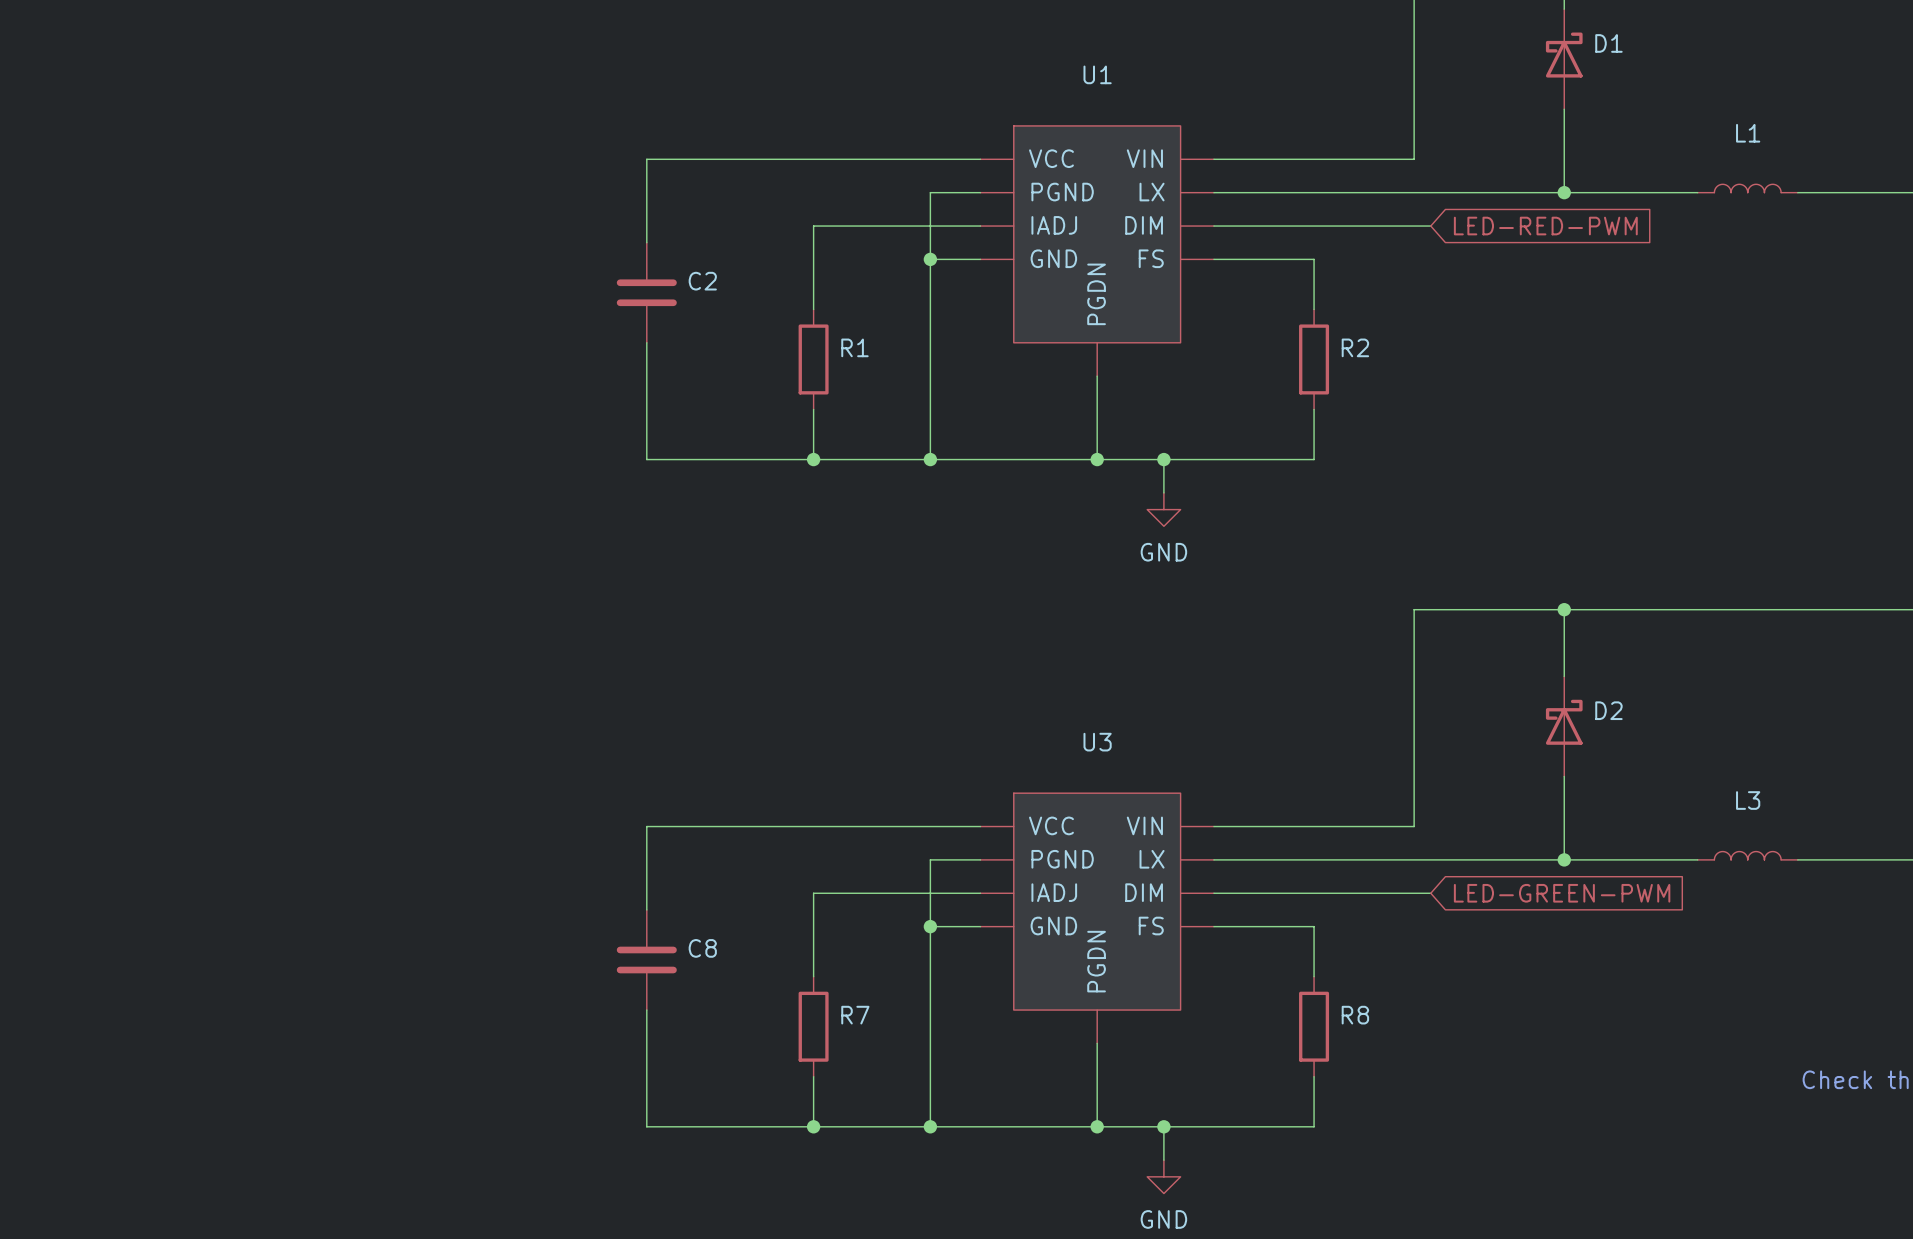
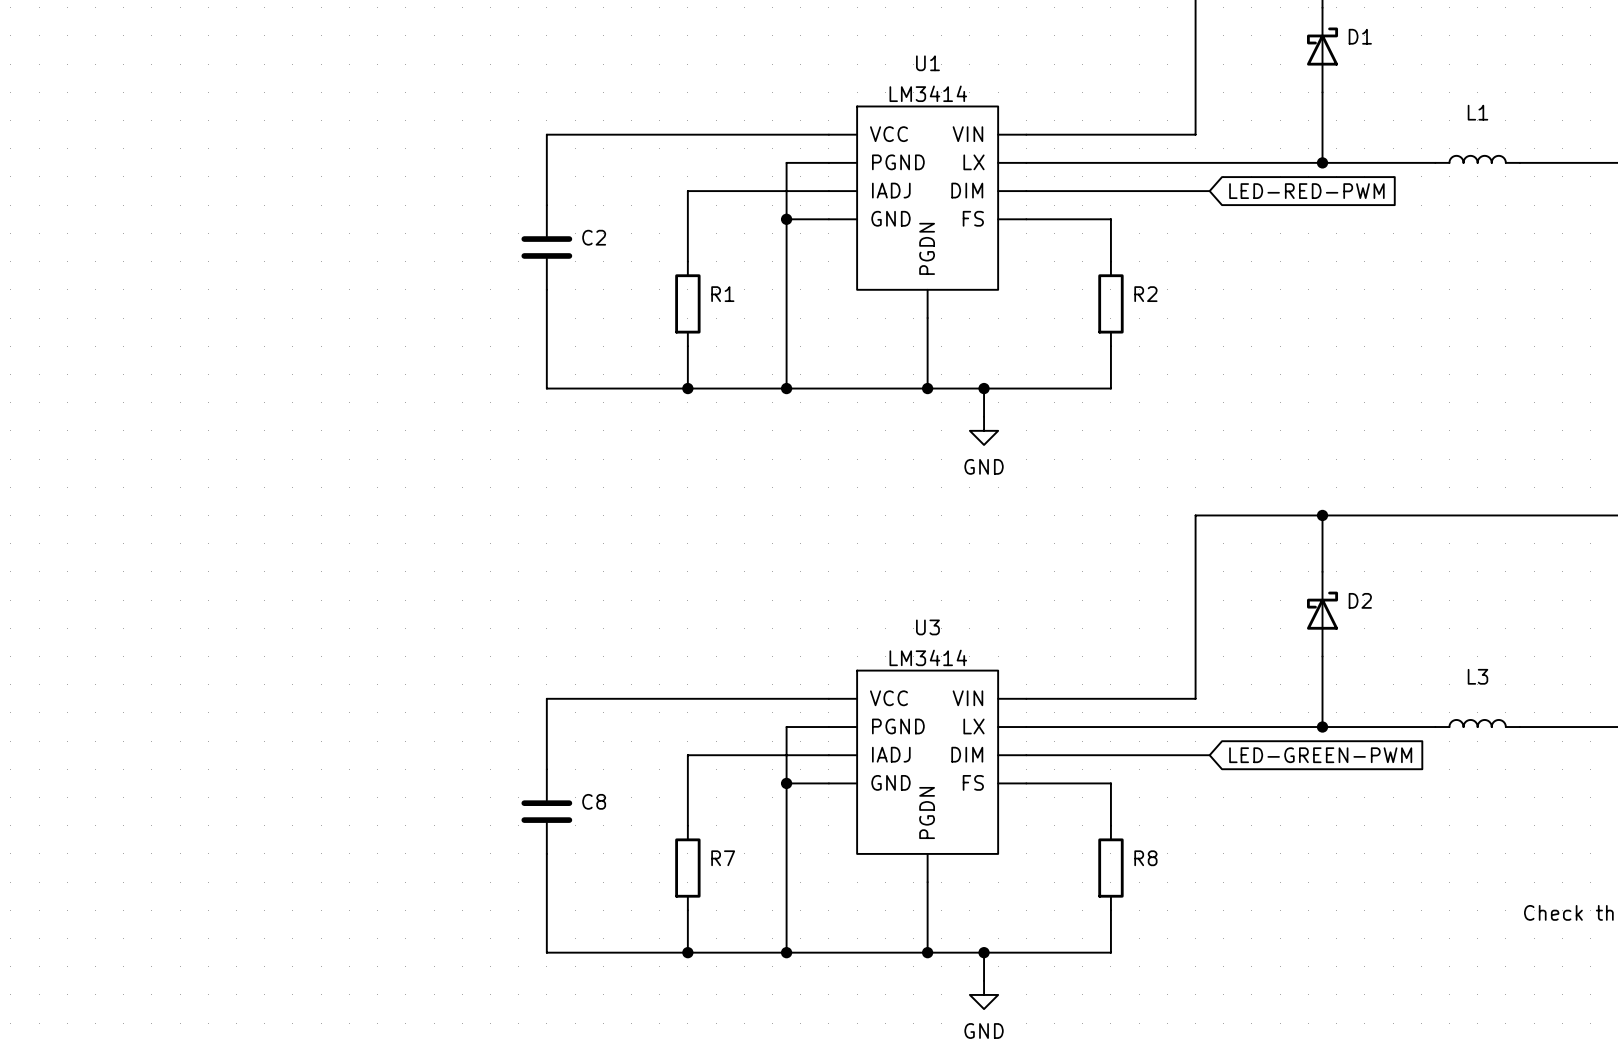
U1 value: none -> LM3414 (928, 93)
U3 value: none -> LM3414 (928, 657)

